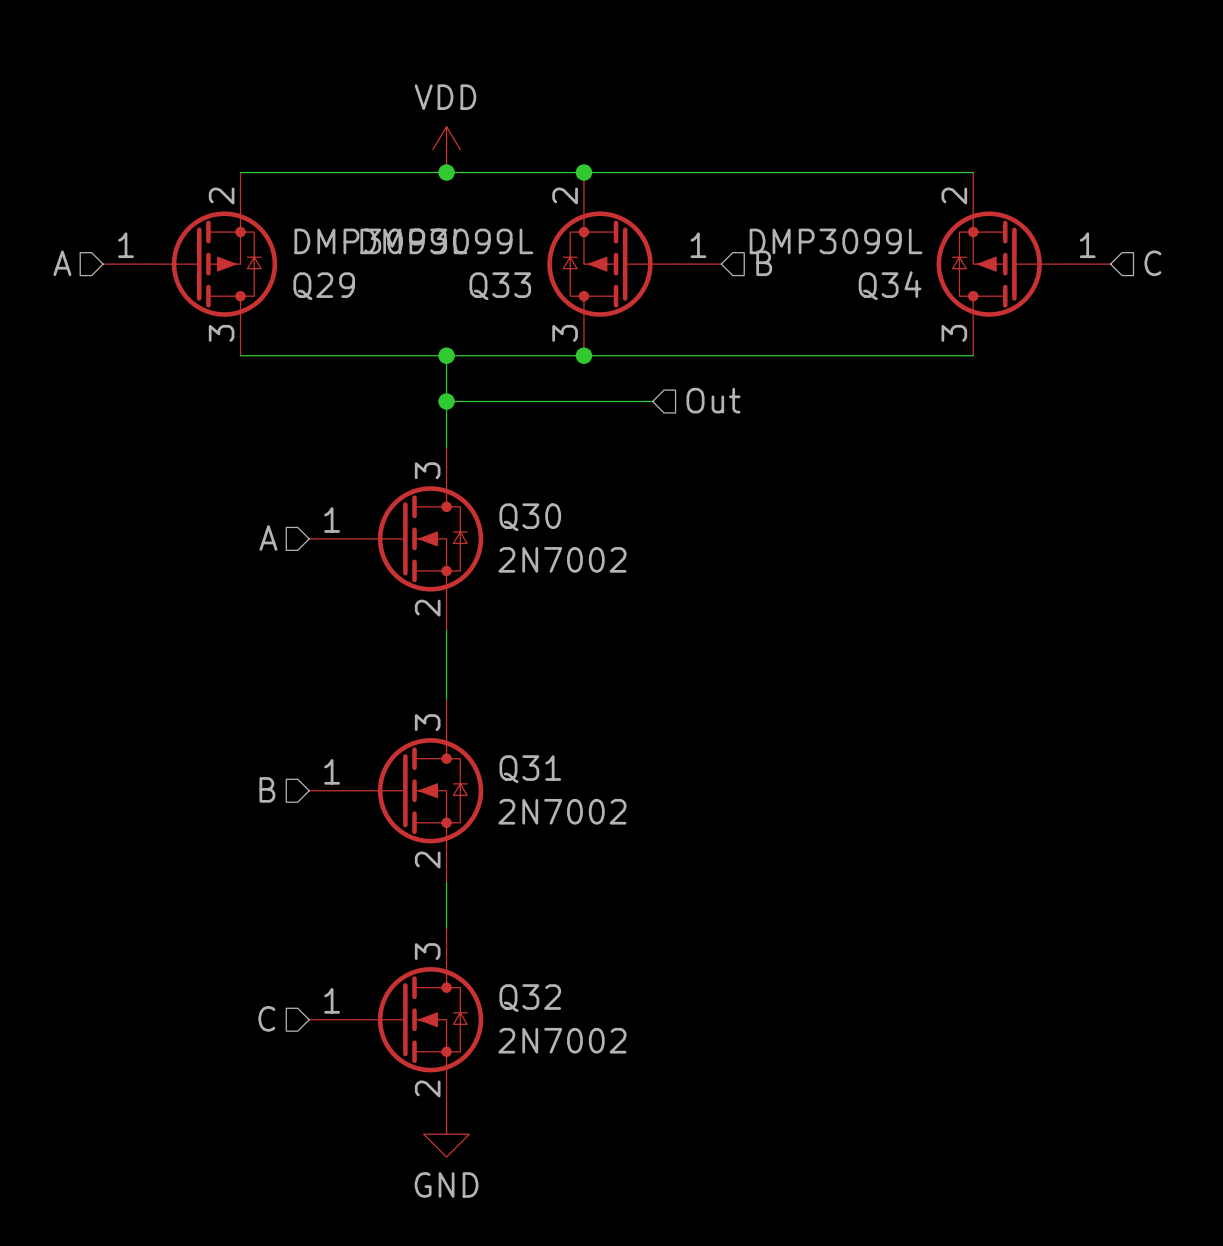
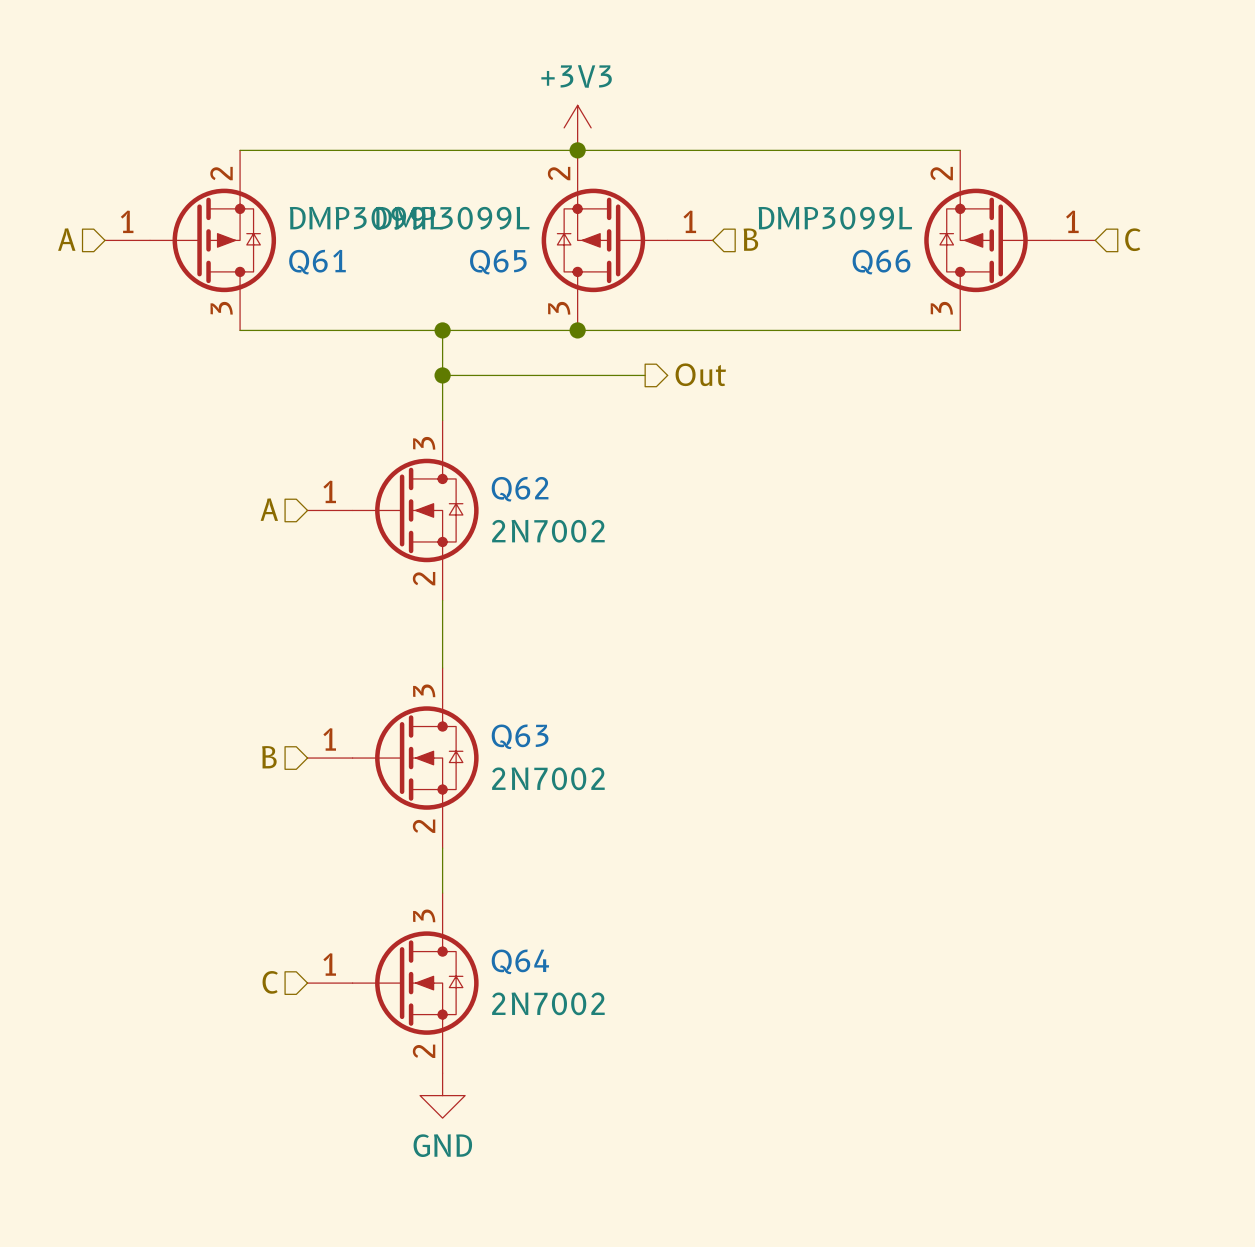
power symbol: VDD (446, 149) -> none
power symbol: none -> +3V3 (577, 127)
junction: (446, 172) -> none
Q34 name: Q34 (890, 285) -> Q66 (881, 262)
Q29 name: Q29 (324, 286) -> Q61 (317, 262)
Q33 name: Q33 (500, 286) -> Q65 (498, 262)
hierarchical label shape: input (713, 400) -> output (700, 374)
Q30 name: Q30 (530, 517) -> Q62 (520, 489)
Q31 name: Q31 (530, 769) -> Q63 (520, 736)
Q32 name: Q32 (530, 998) -> Q64 (520, 961)

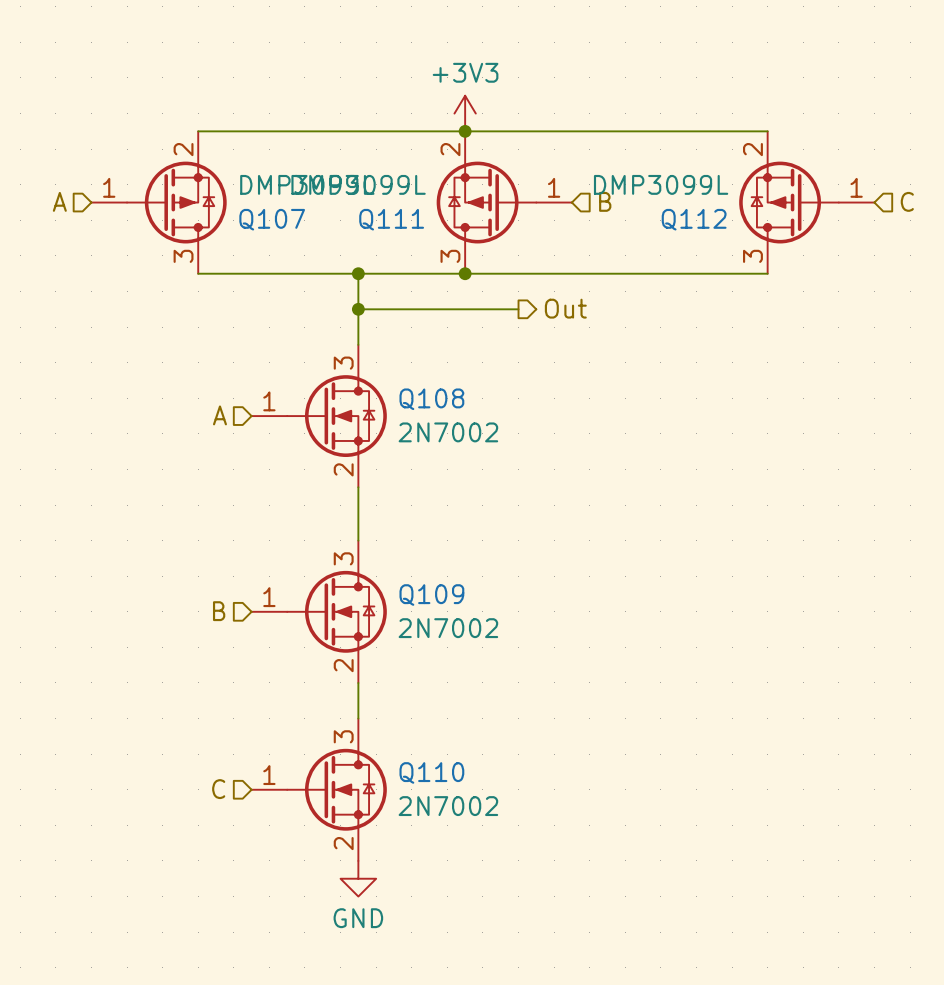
Q61 name: Q61 (317, 262) -> Q107 (272, 219)
Q65 name: Q65 (498, 262) -> Q111 (391, 219)
Q66 name: Q66 (881, 262) -> Q112 (694, 219)
Q62 name: Q62 (520, 489) -> Q108 (431, 399)
Q63 name: Q63 (520, 736) -> Q109 (431, 595)
Q64 name: Q64 (520, 961) -> Q110 (431, 772)

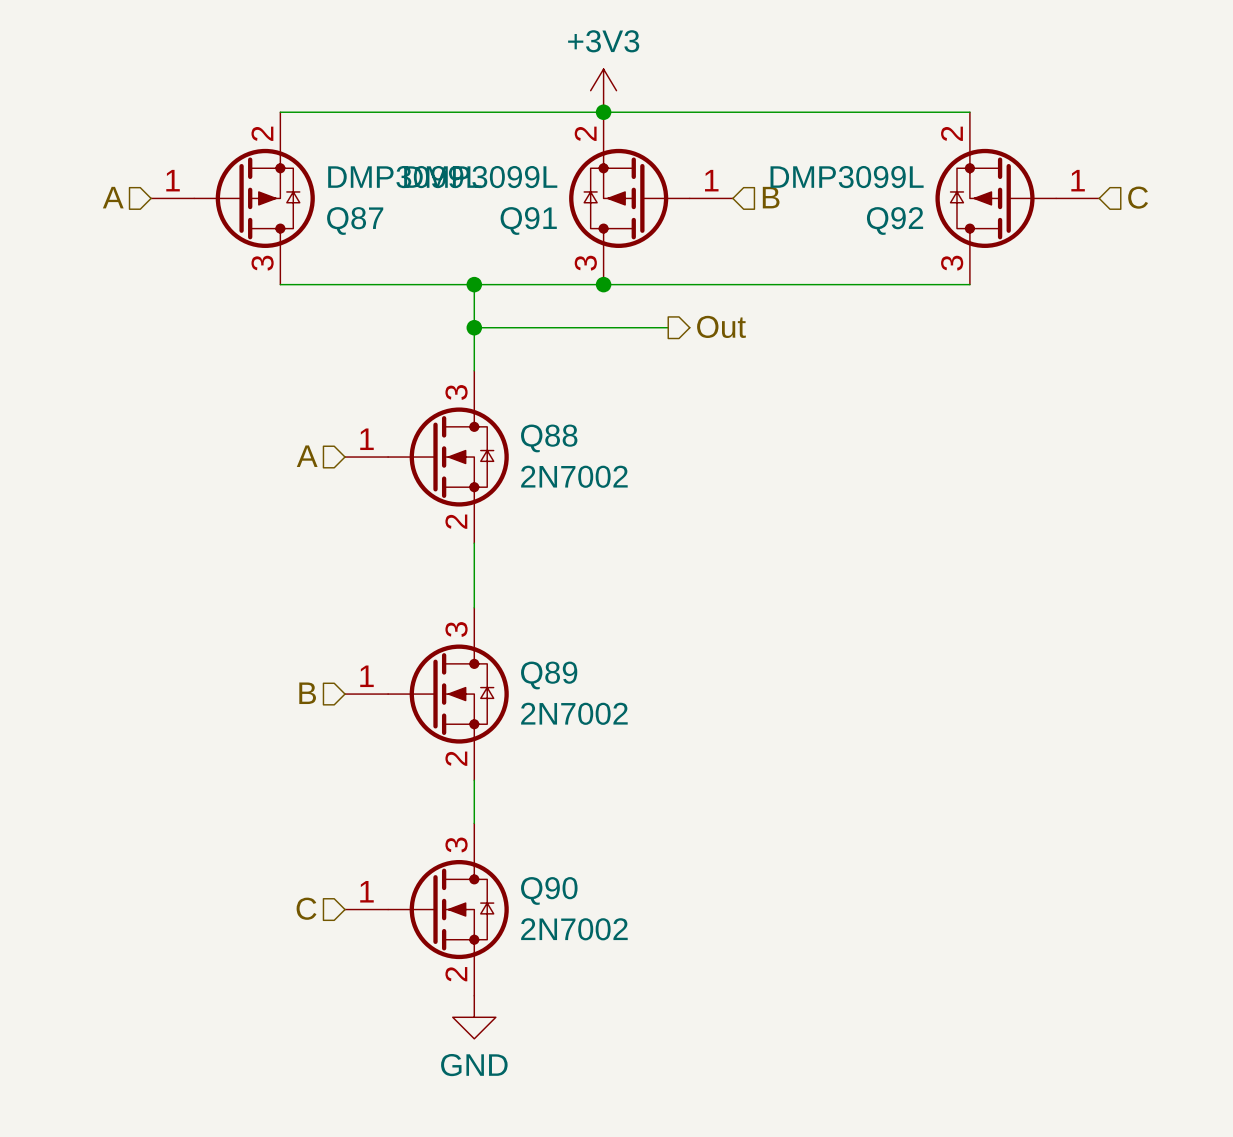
Q107 name: Q107 (272, 219) -> Q87 (355, 220)
Q111 name: Q111 (391, 219) -> Q91 (528, 220)
Q112 name: Q112 (694, 219) -> Q92 (895, 220)
Q108 name: Q108 (431, 399) -> Q88 (549, 438)
Q109 name: Q109 (431, 595) -> Q89 (549, 675)
Q110 name: Q110 (431, 772) -> Q90 (549, 890)

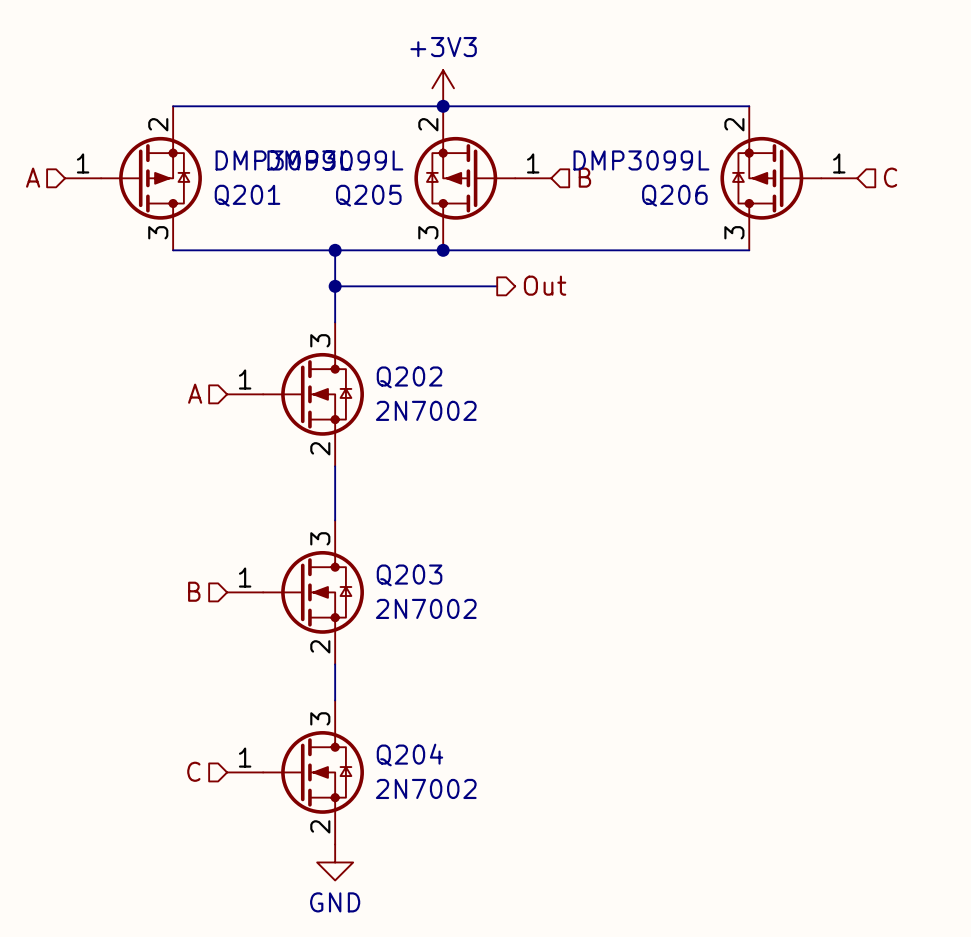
Q87 name: Q87 (355, 220) -> Q201 (247, 195)
Q91 name: Q91 (528, 220) -> Q205 (368, 195)
Q92 name: Q92 (895, 220) -> Q206 (674, 195)
Q88 name: Q88 (549, 438) -> Q202 (409, 377)
Q89 name: Q89 (549, 675) -> Q203 (409, 575)
Q90 name: Q90 (549, 890) -> Q204 (409, 755)

